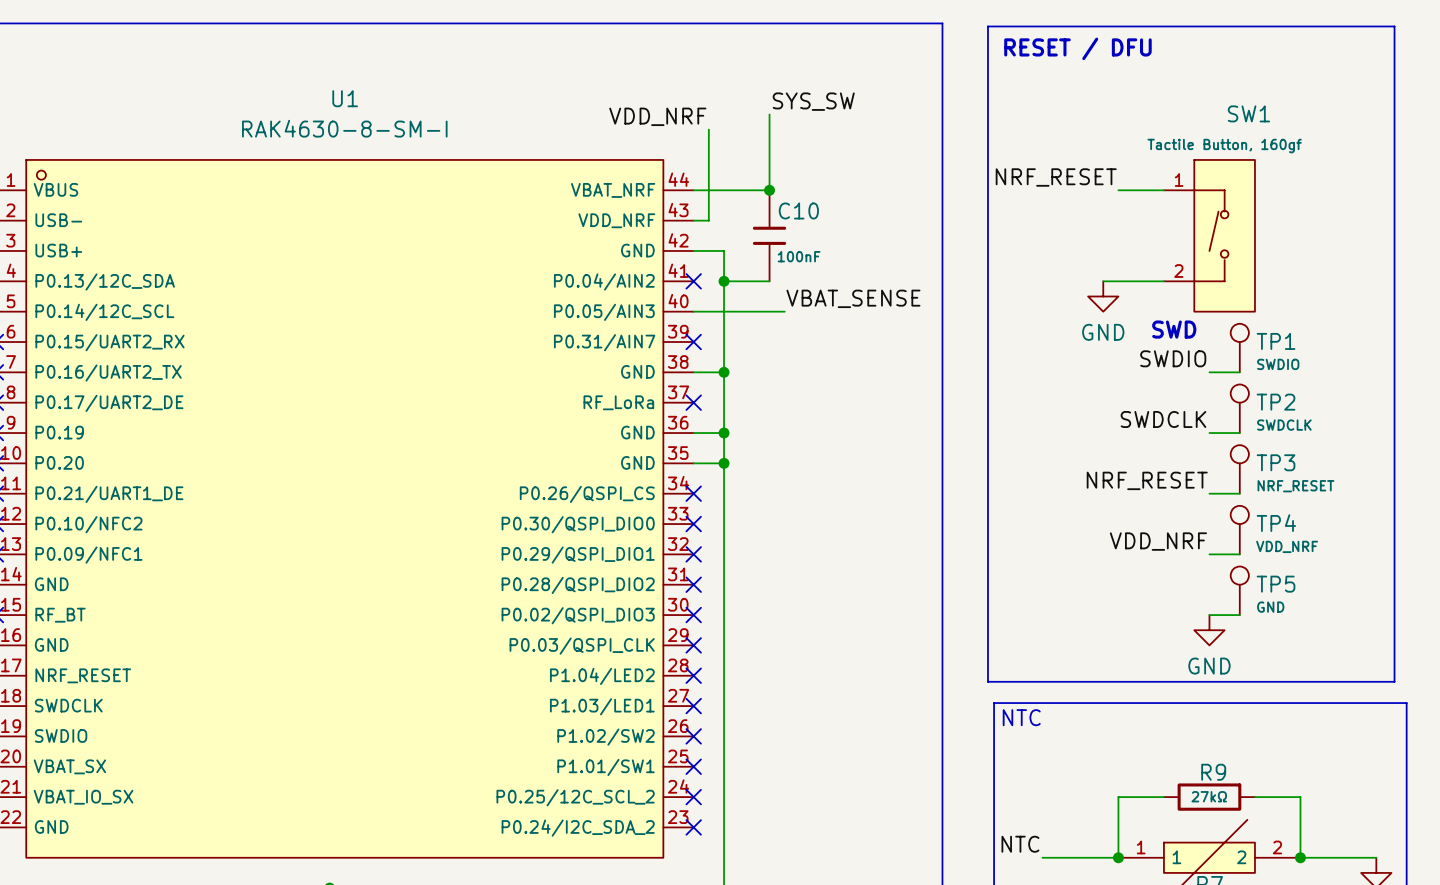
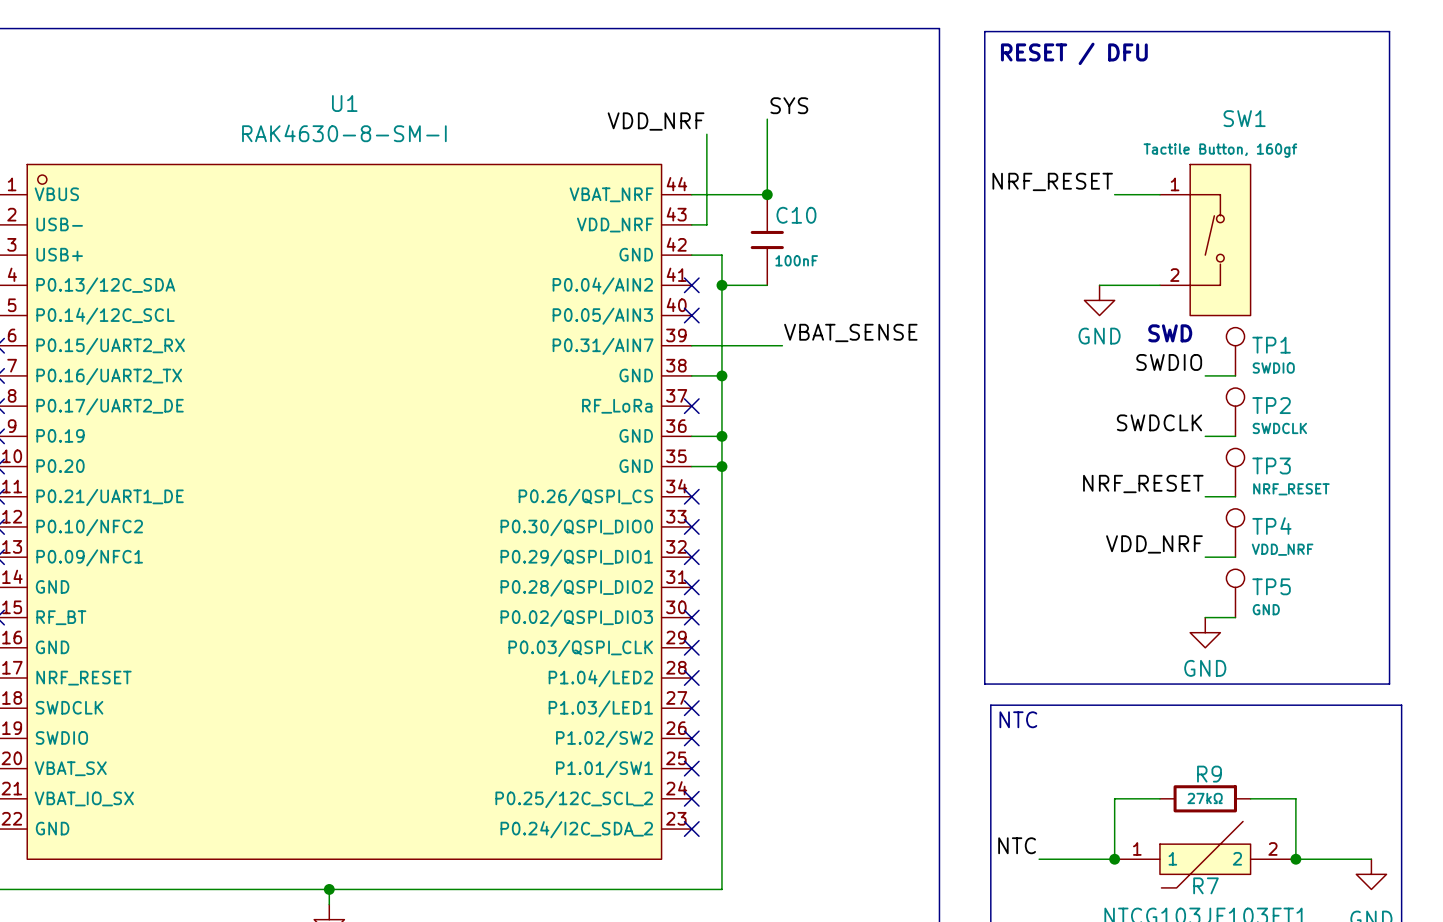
label: SYS_SW (813, 101) -> SYS (789, 105)
label position: VBAT_SENSE (853, 298) -> VBAT_SENSE (850, 332)
wire: (693, 311) (784, 311) -> (691, 345) (782, 345)
no-connect mark position: (693, 342) -> (691, 315)

